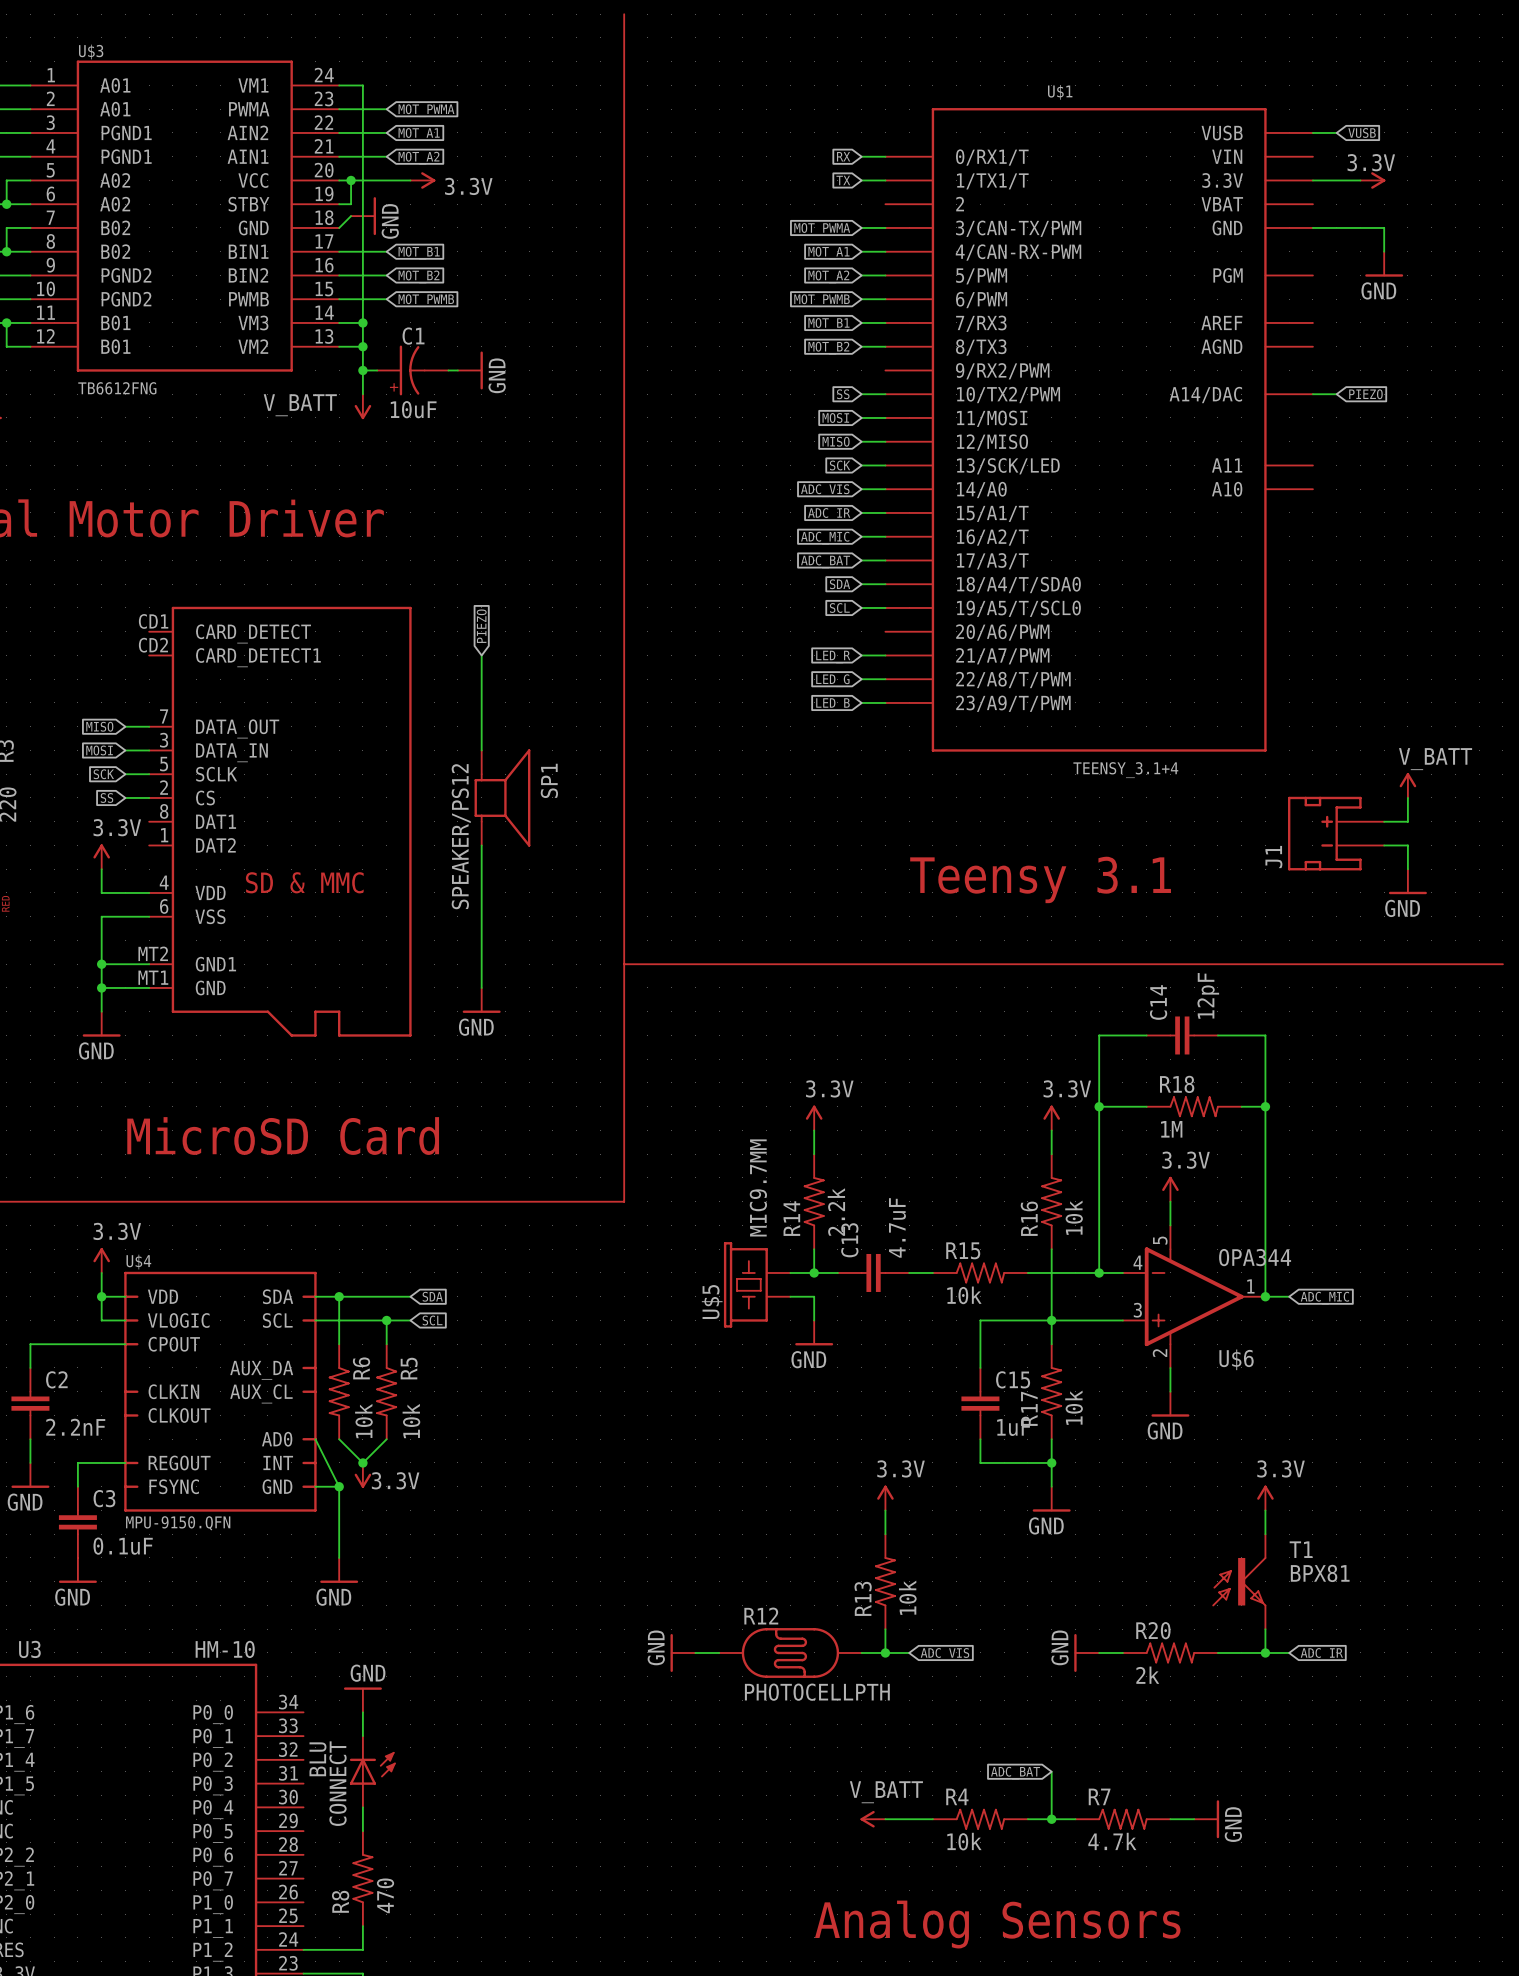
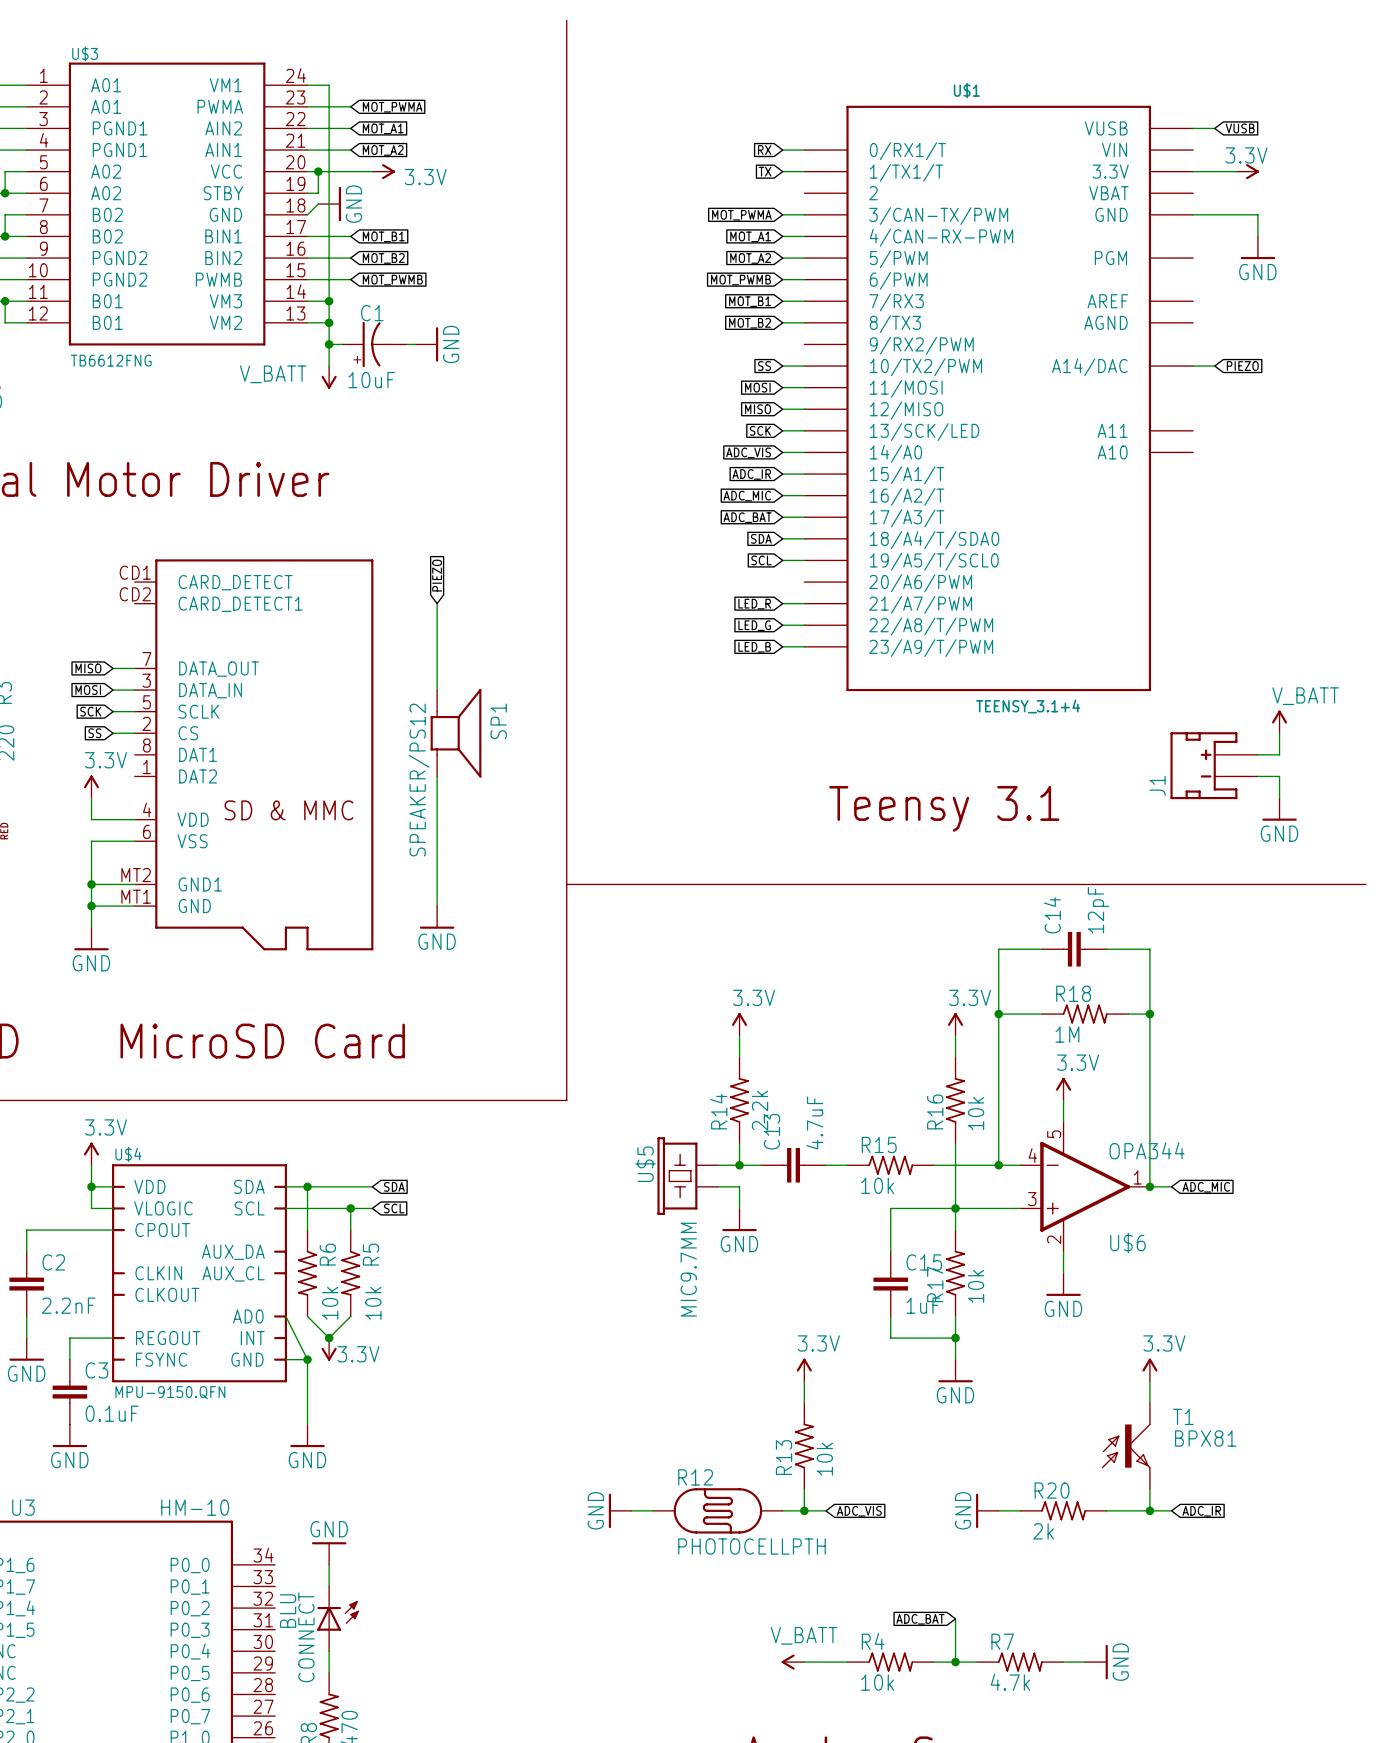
U$5 value position: MIC9.7MM (758, 1187) -> MIC9.7MM (688, 1269)
U$5 name position: U$5 (712, 1302) -> U$5 (645, 1164)

